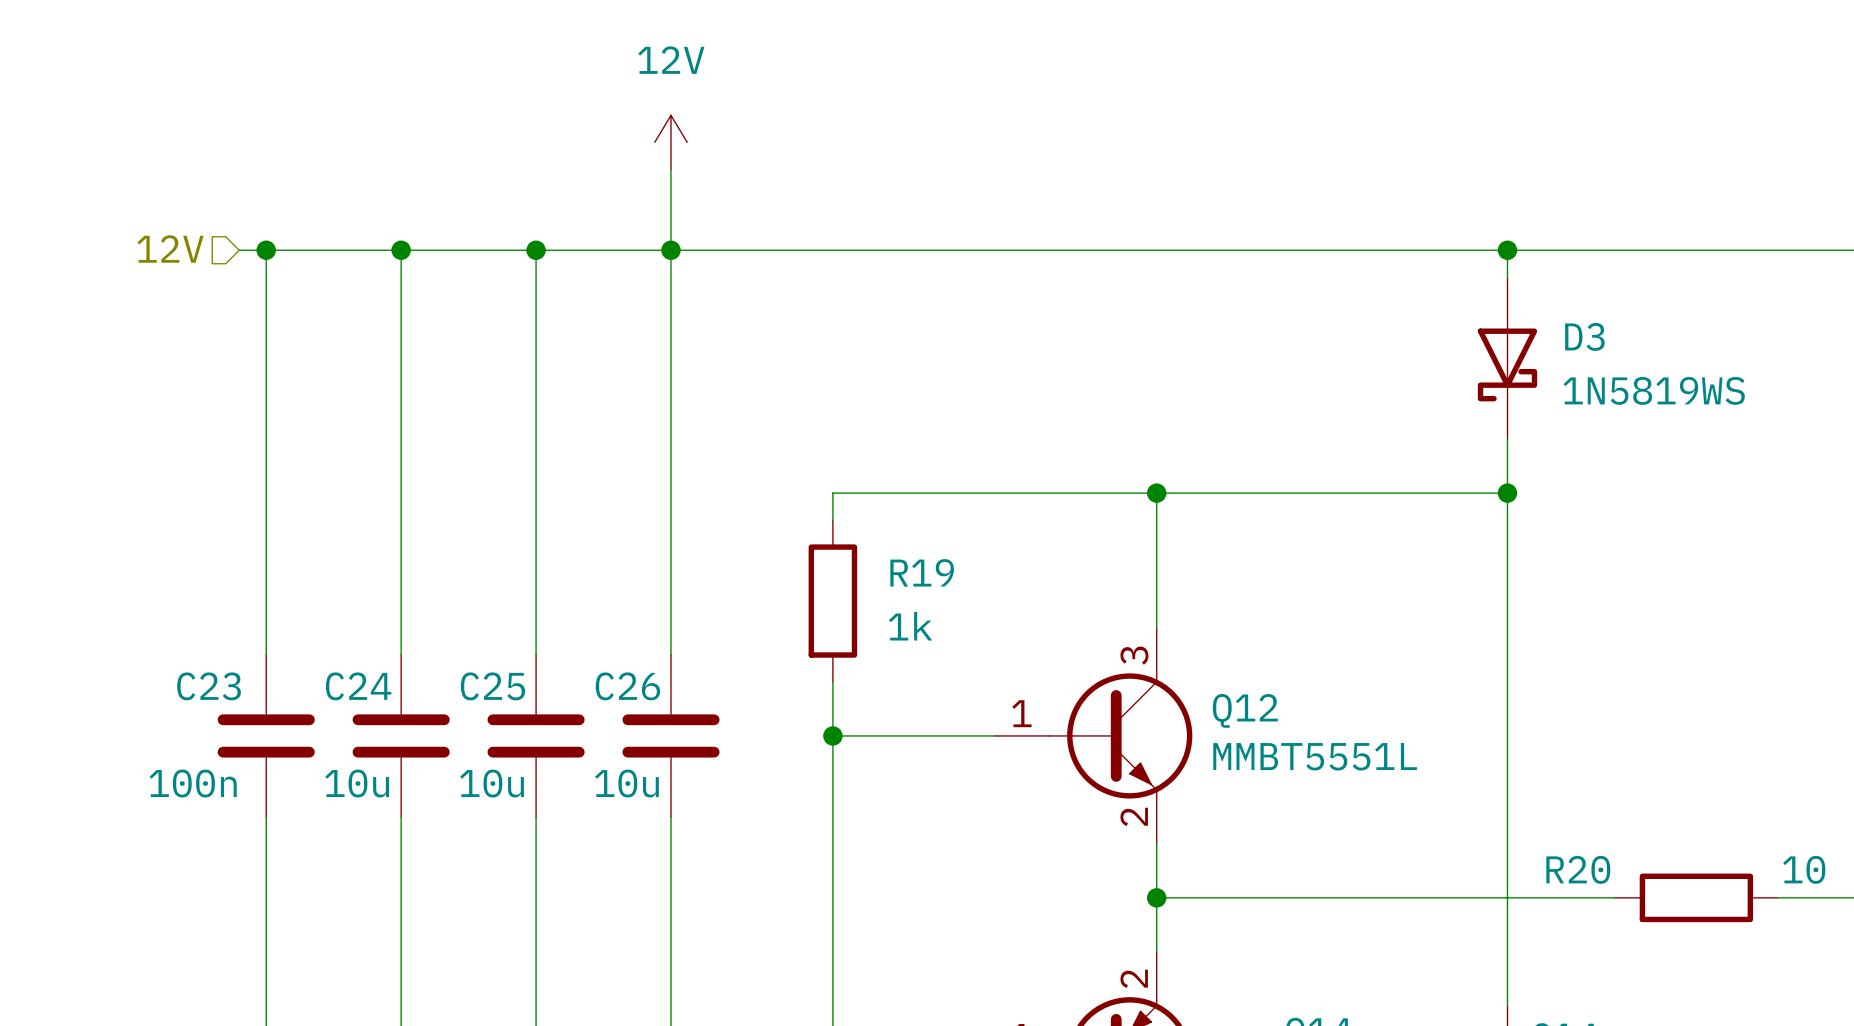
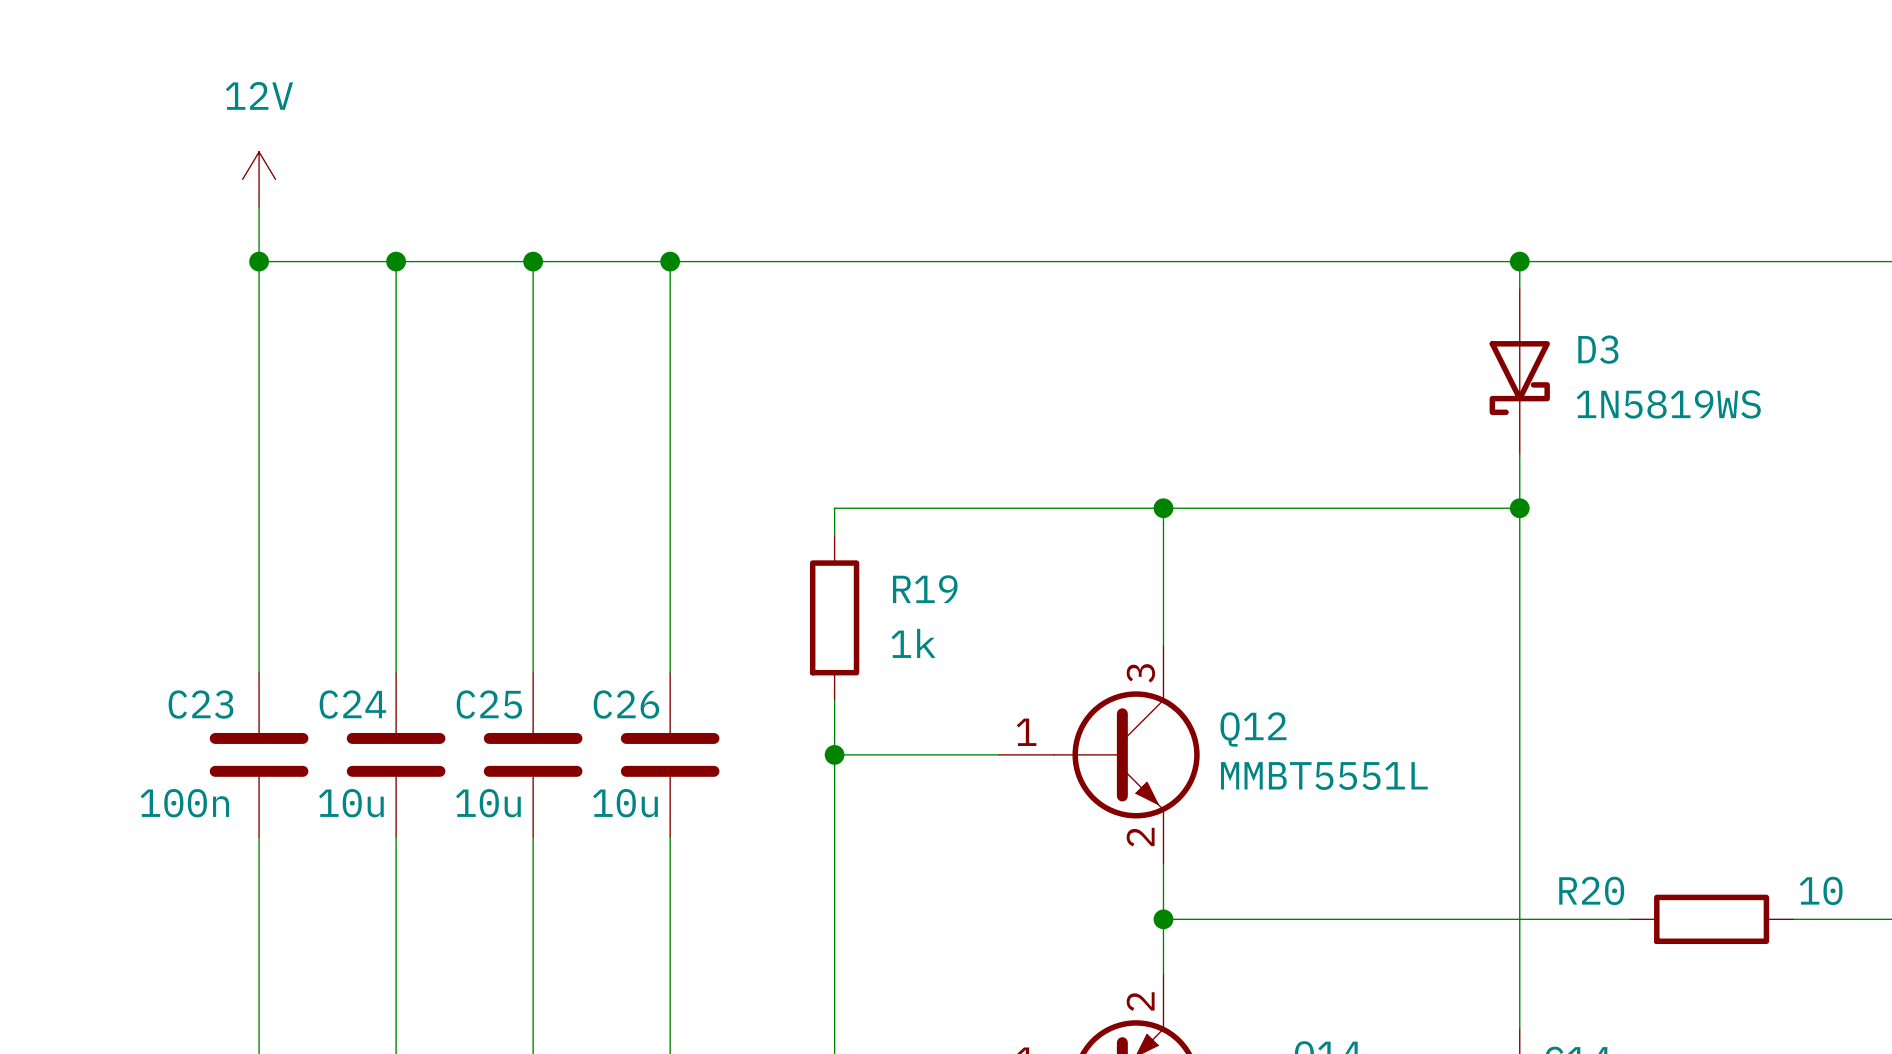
power symbol position: 12V (670, 142) -> 12V (259, 179)
wire: (670, 169) (670, 250) -> none
hierarchical label: 12V (170, 249) -> none
wire: (239, 250) (266, 250) -> (259, 206) (259, 261)

